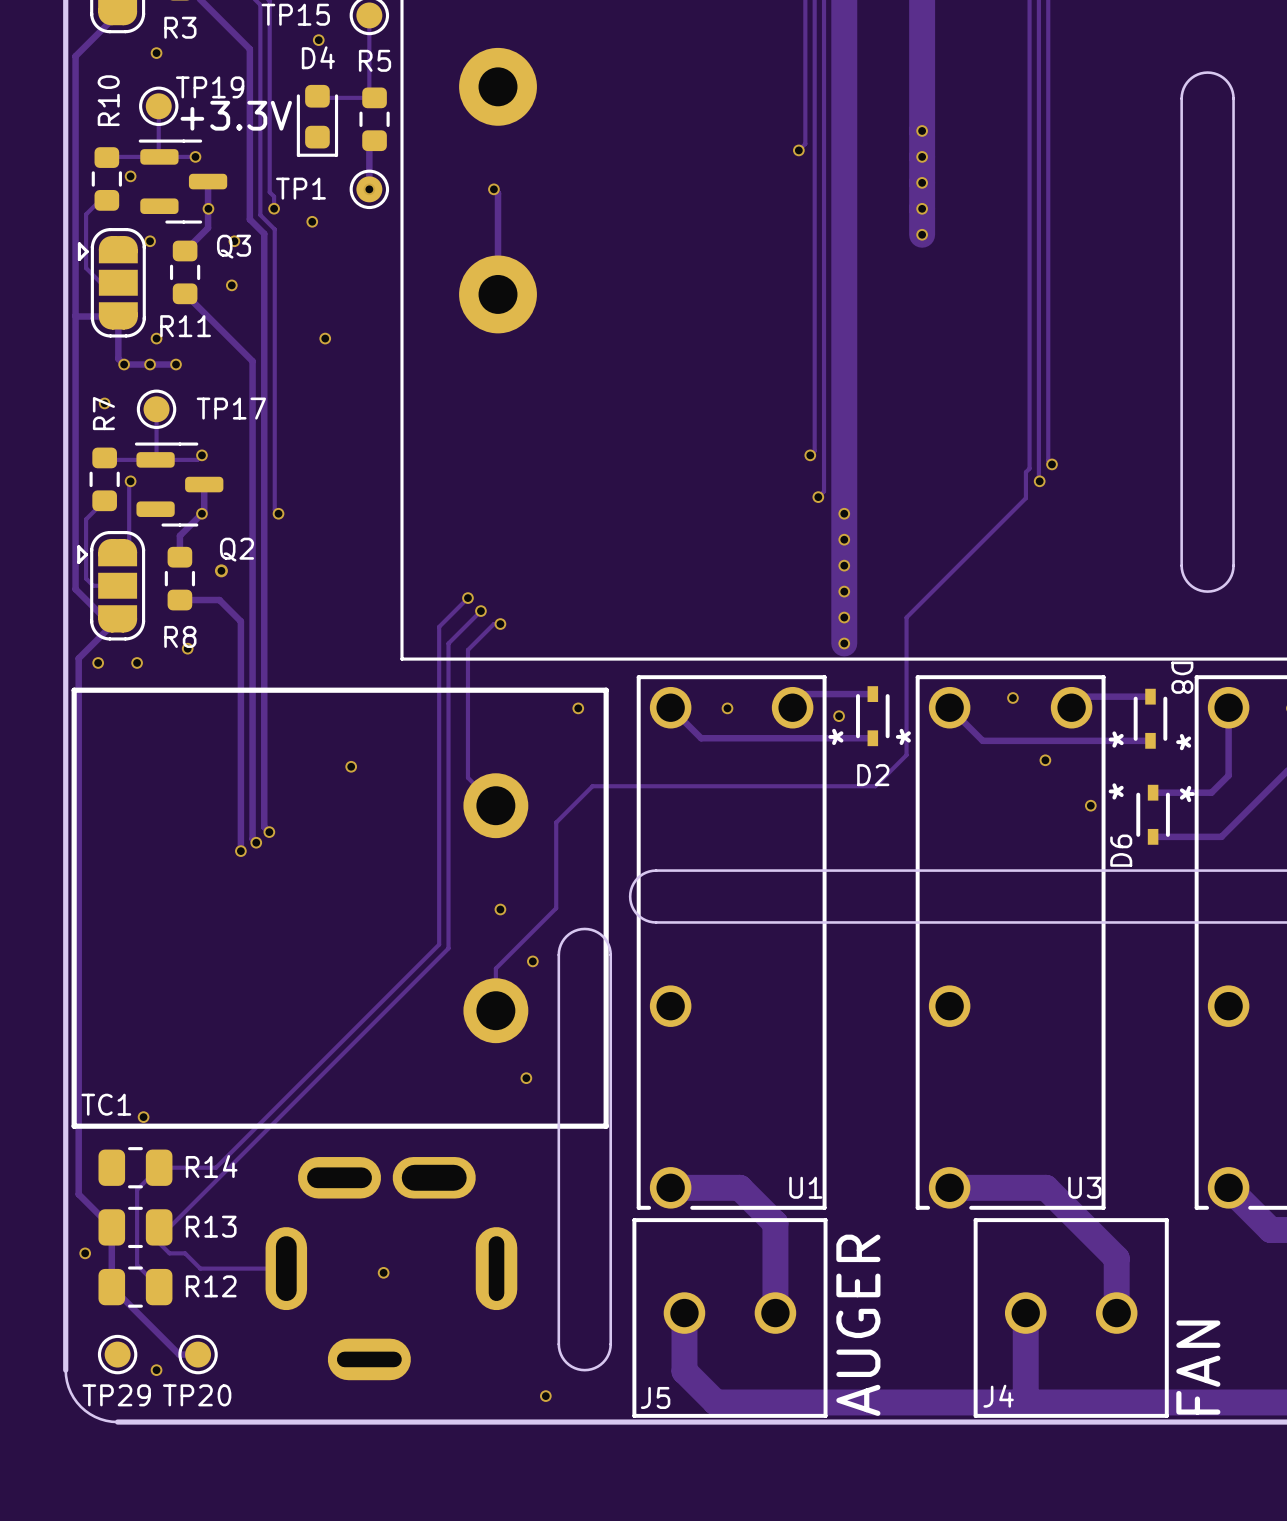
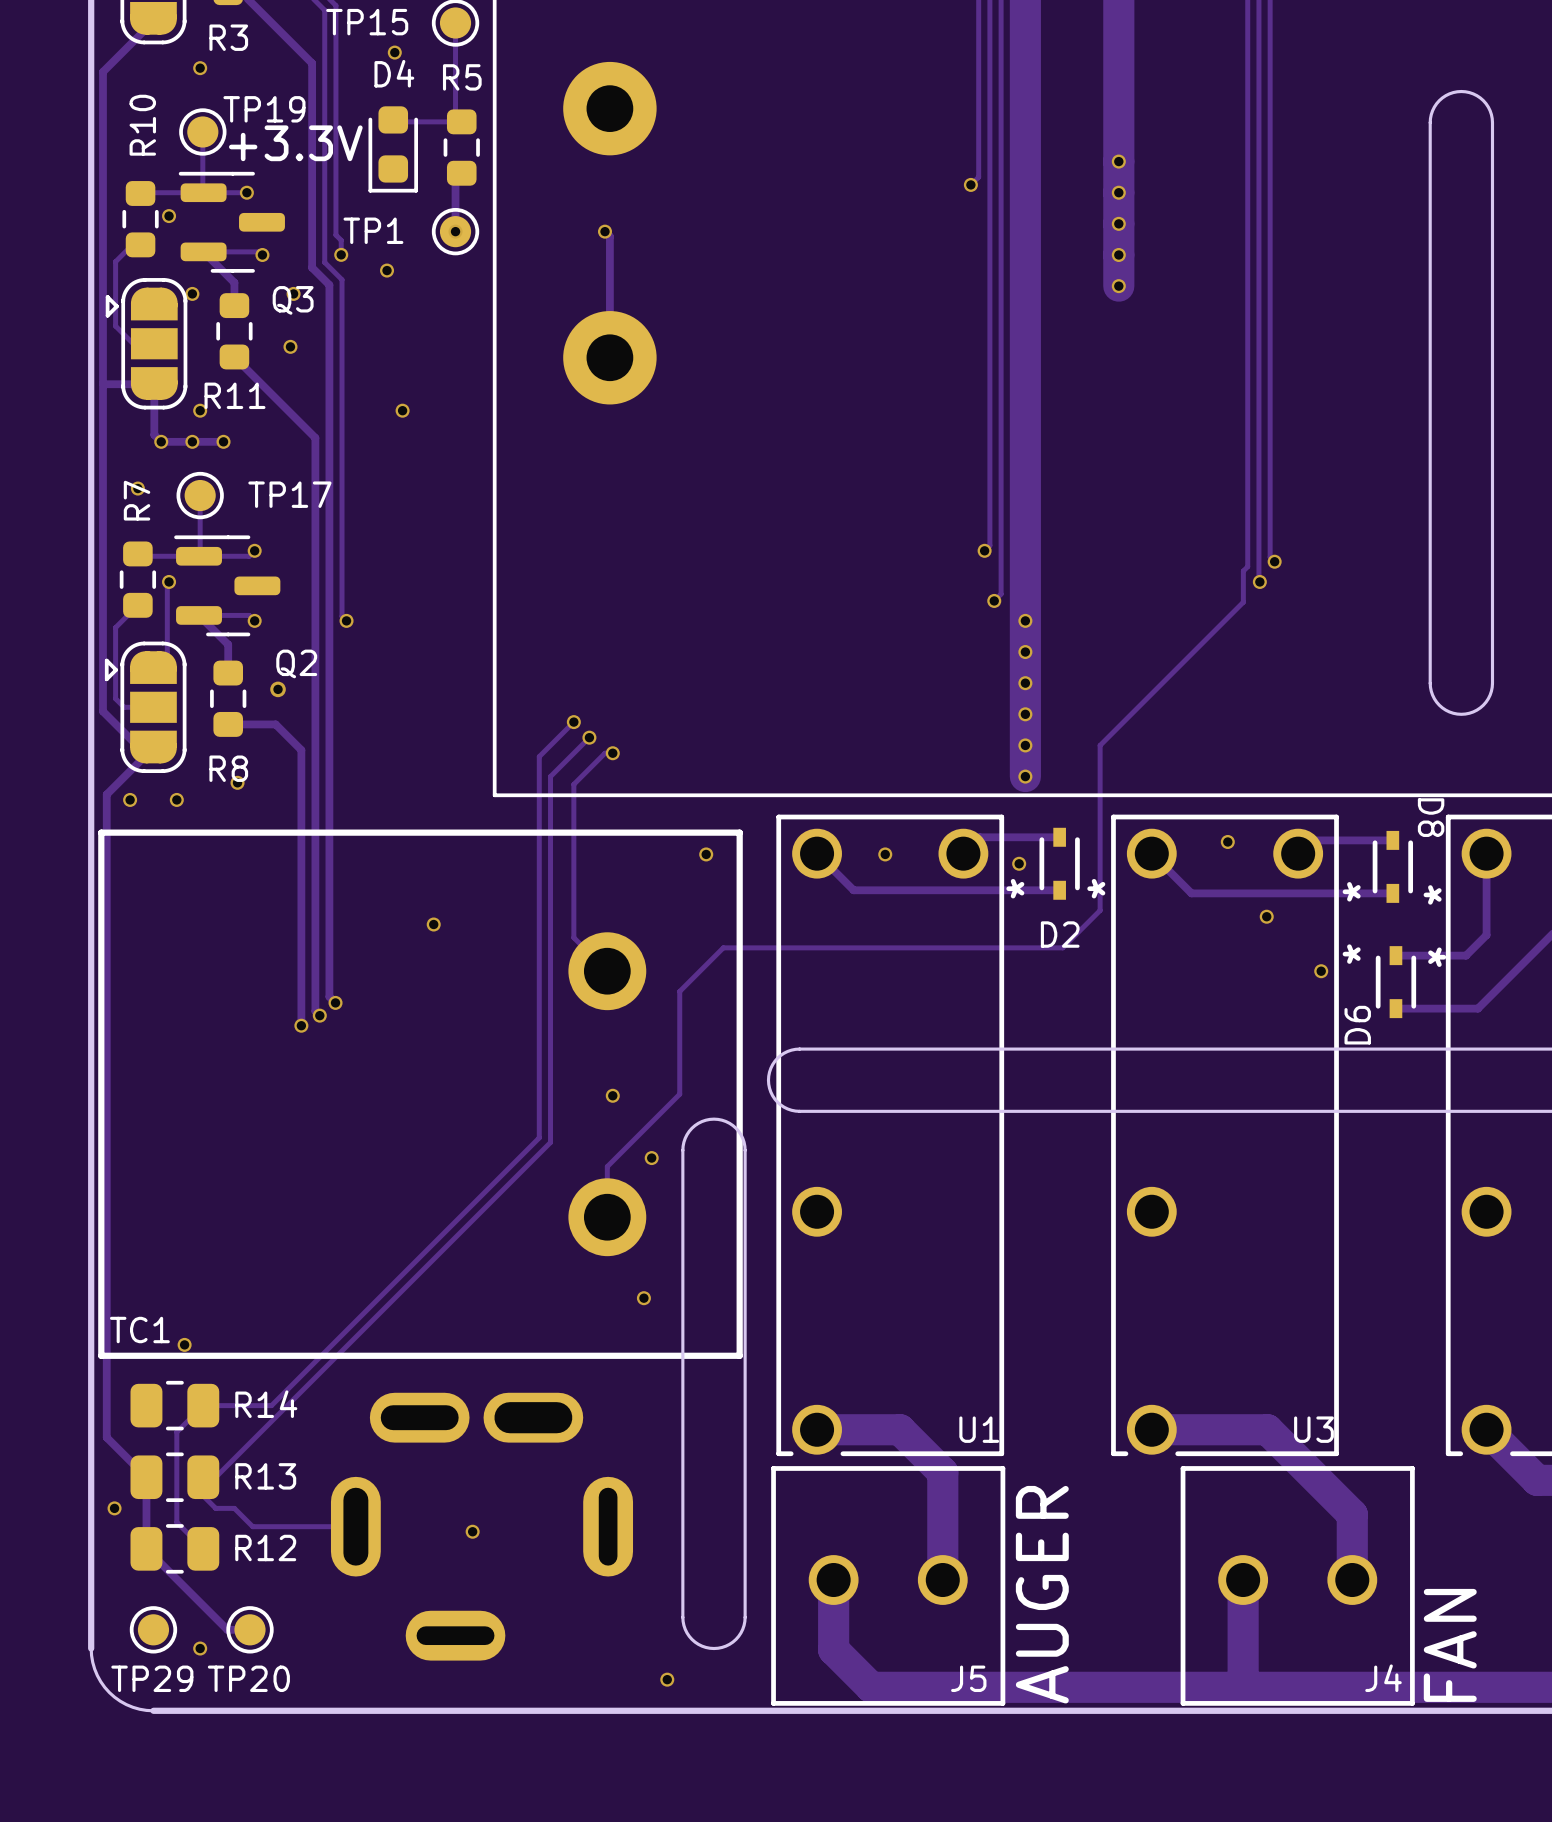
track: (208, 181) (208, 228) (185, 250) -> (262, 254) (259, 251) (203, 251) (234, 282) (234, 305)
track: (204, 484) (204, 511) (179, 535) -> (254, 620) (249, 615) (199, 615) (228, 644) (228, 647)
J4 name position: J4 (998, 1396) -> J4 (1383, 1678)
J5 name position: J5 (655, 1397) -> J5 (968, 1678)

